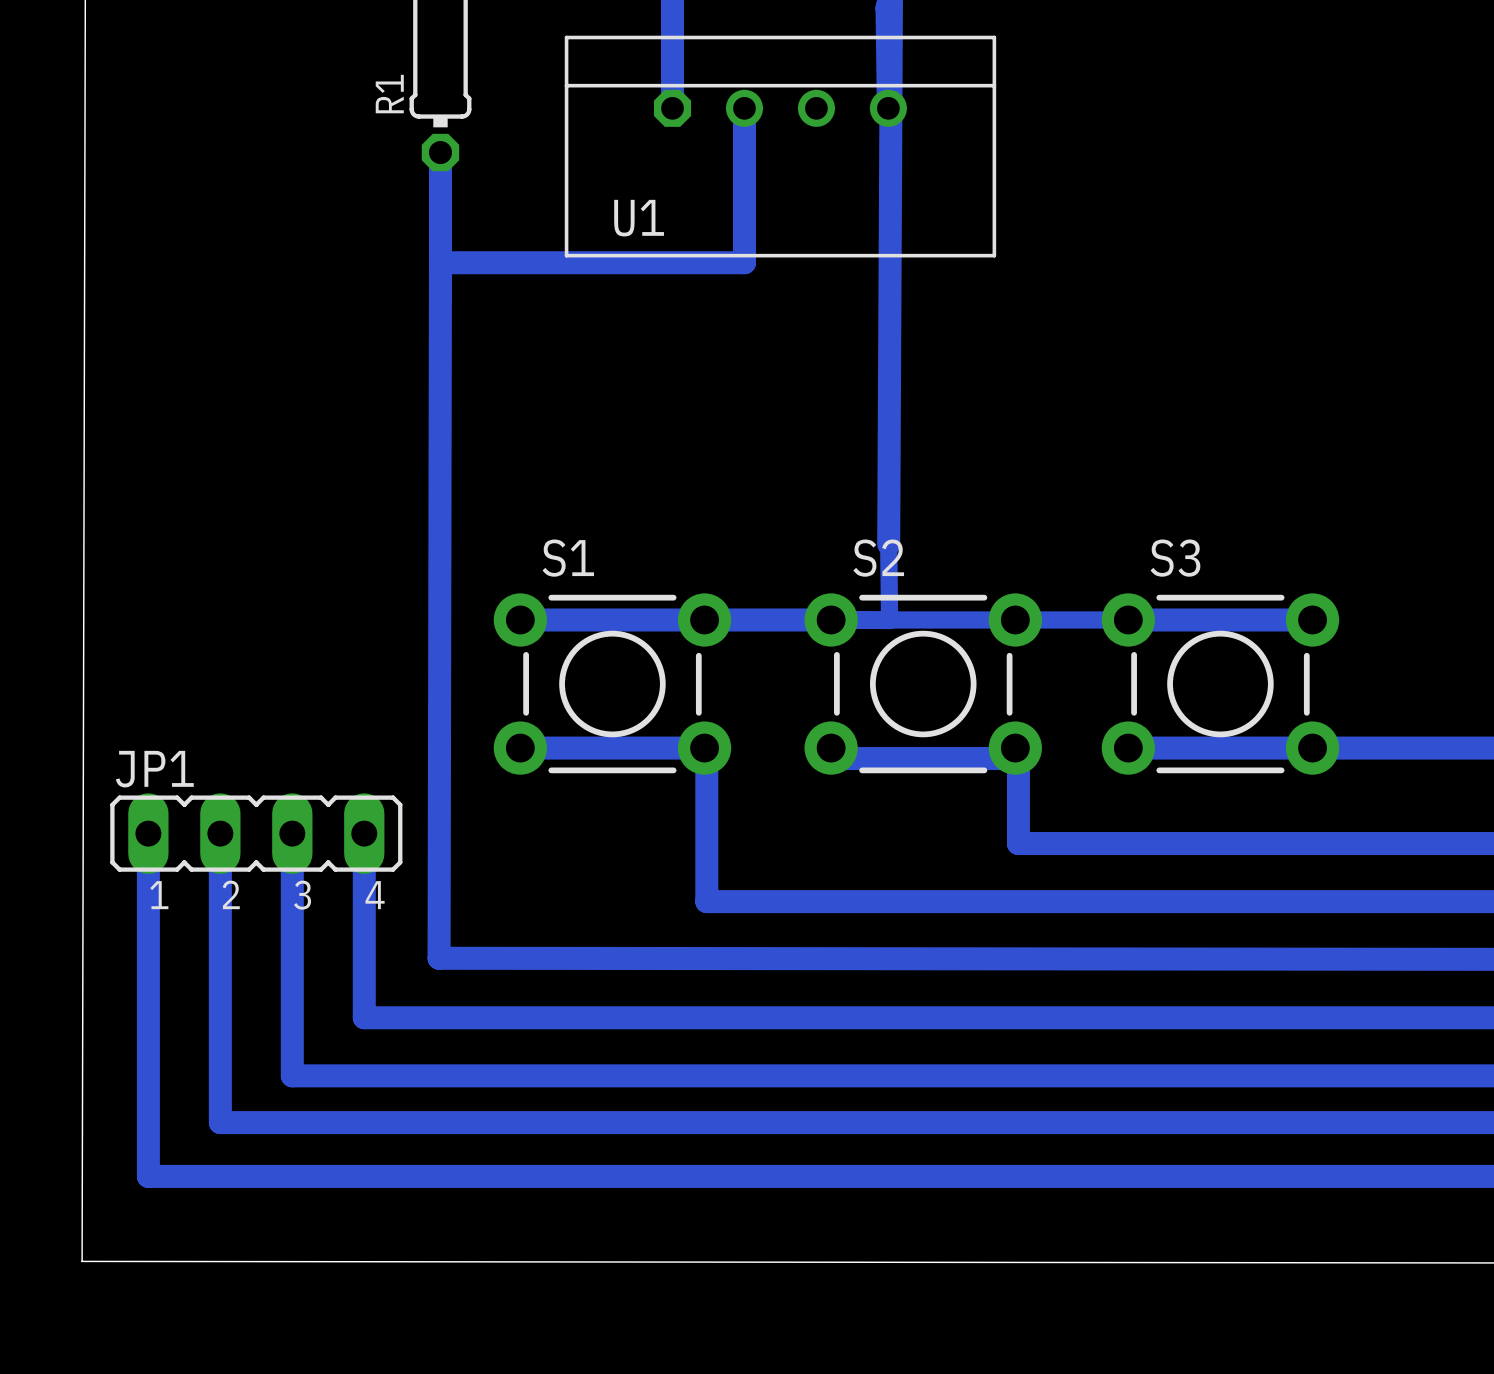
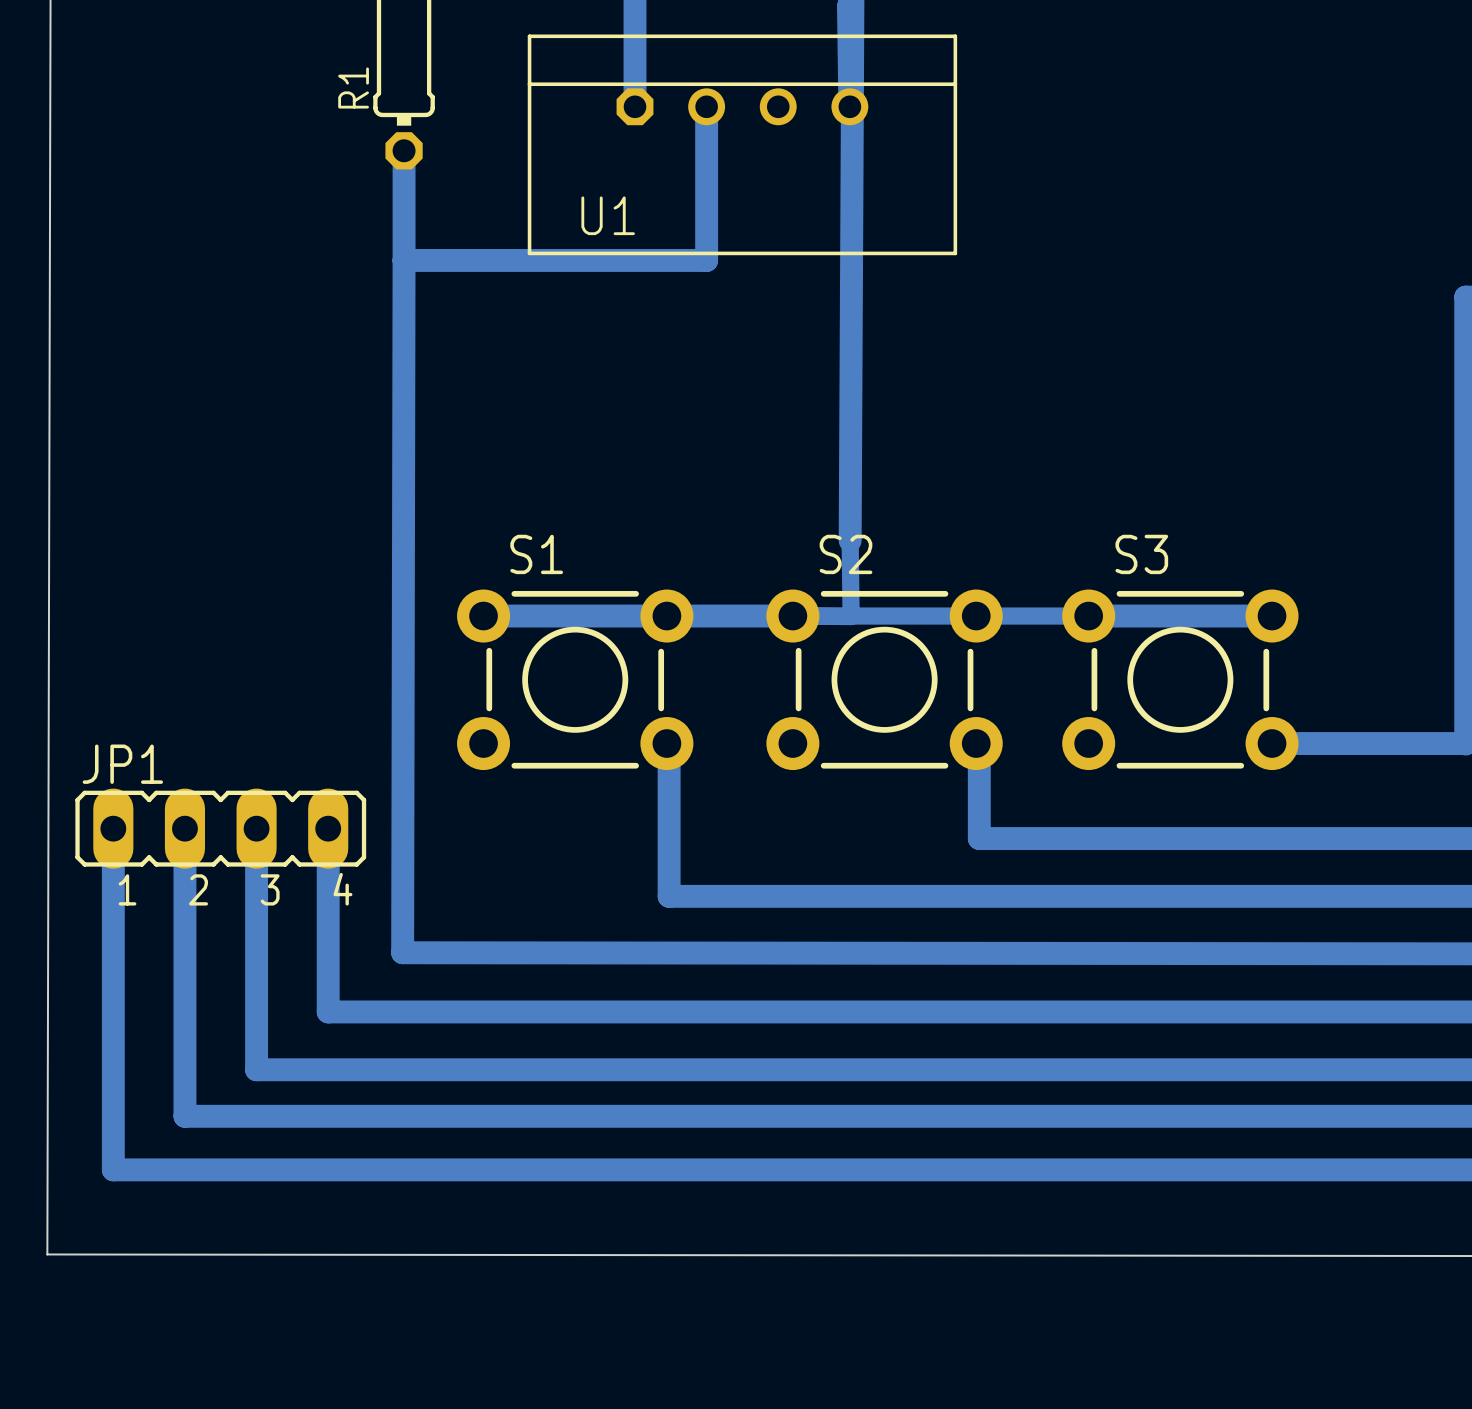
bottom track: (520, 748) (704, 748) -> none
bottom track: (831, 748) (841, 758) (1018, 758) -> none
bottom track: (1128, 748) (1312, 748) -> none

